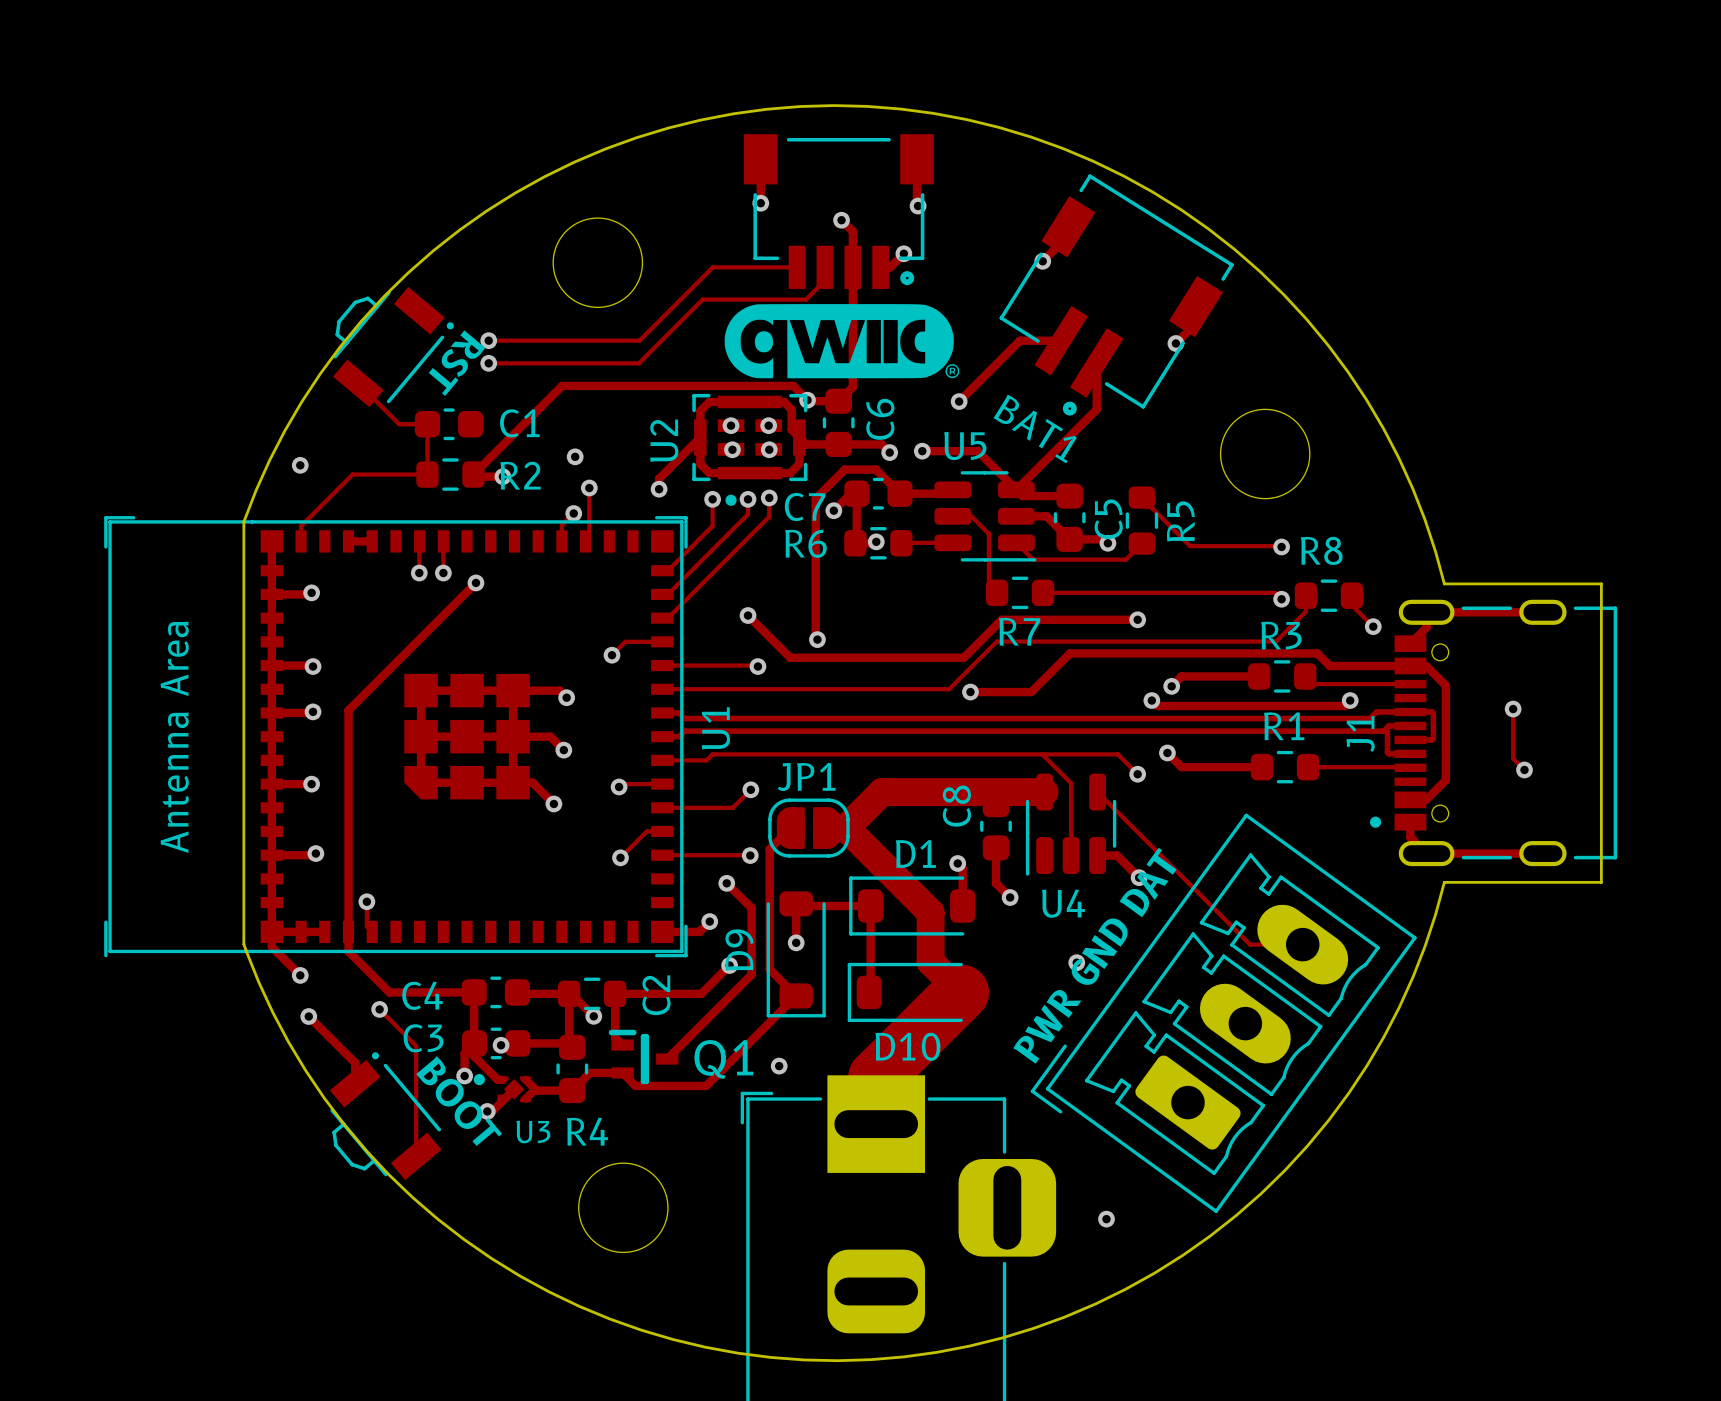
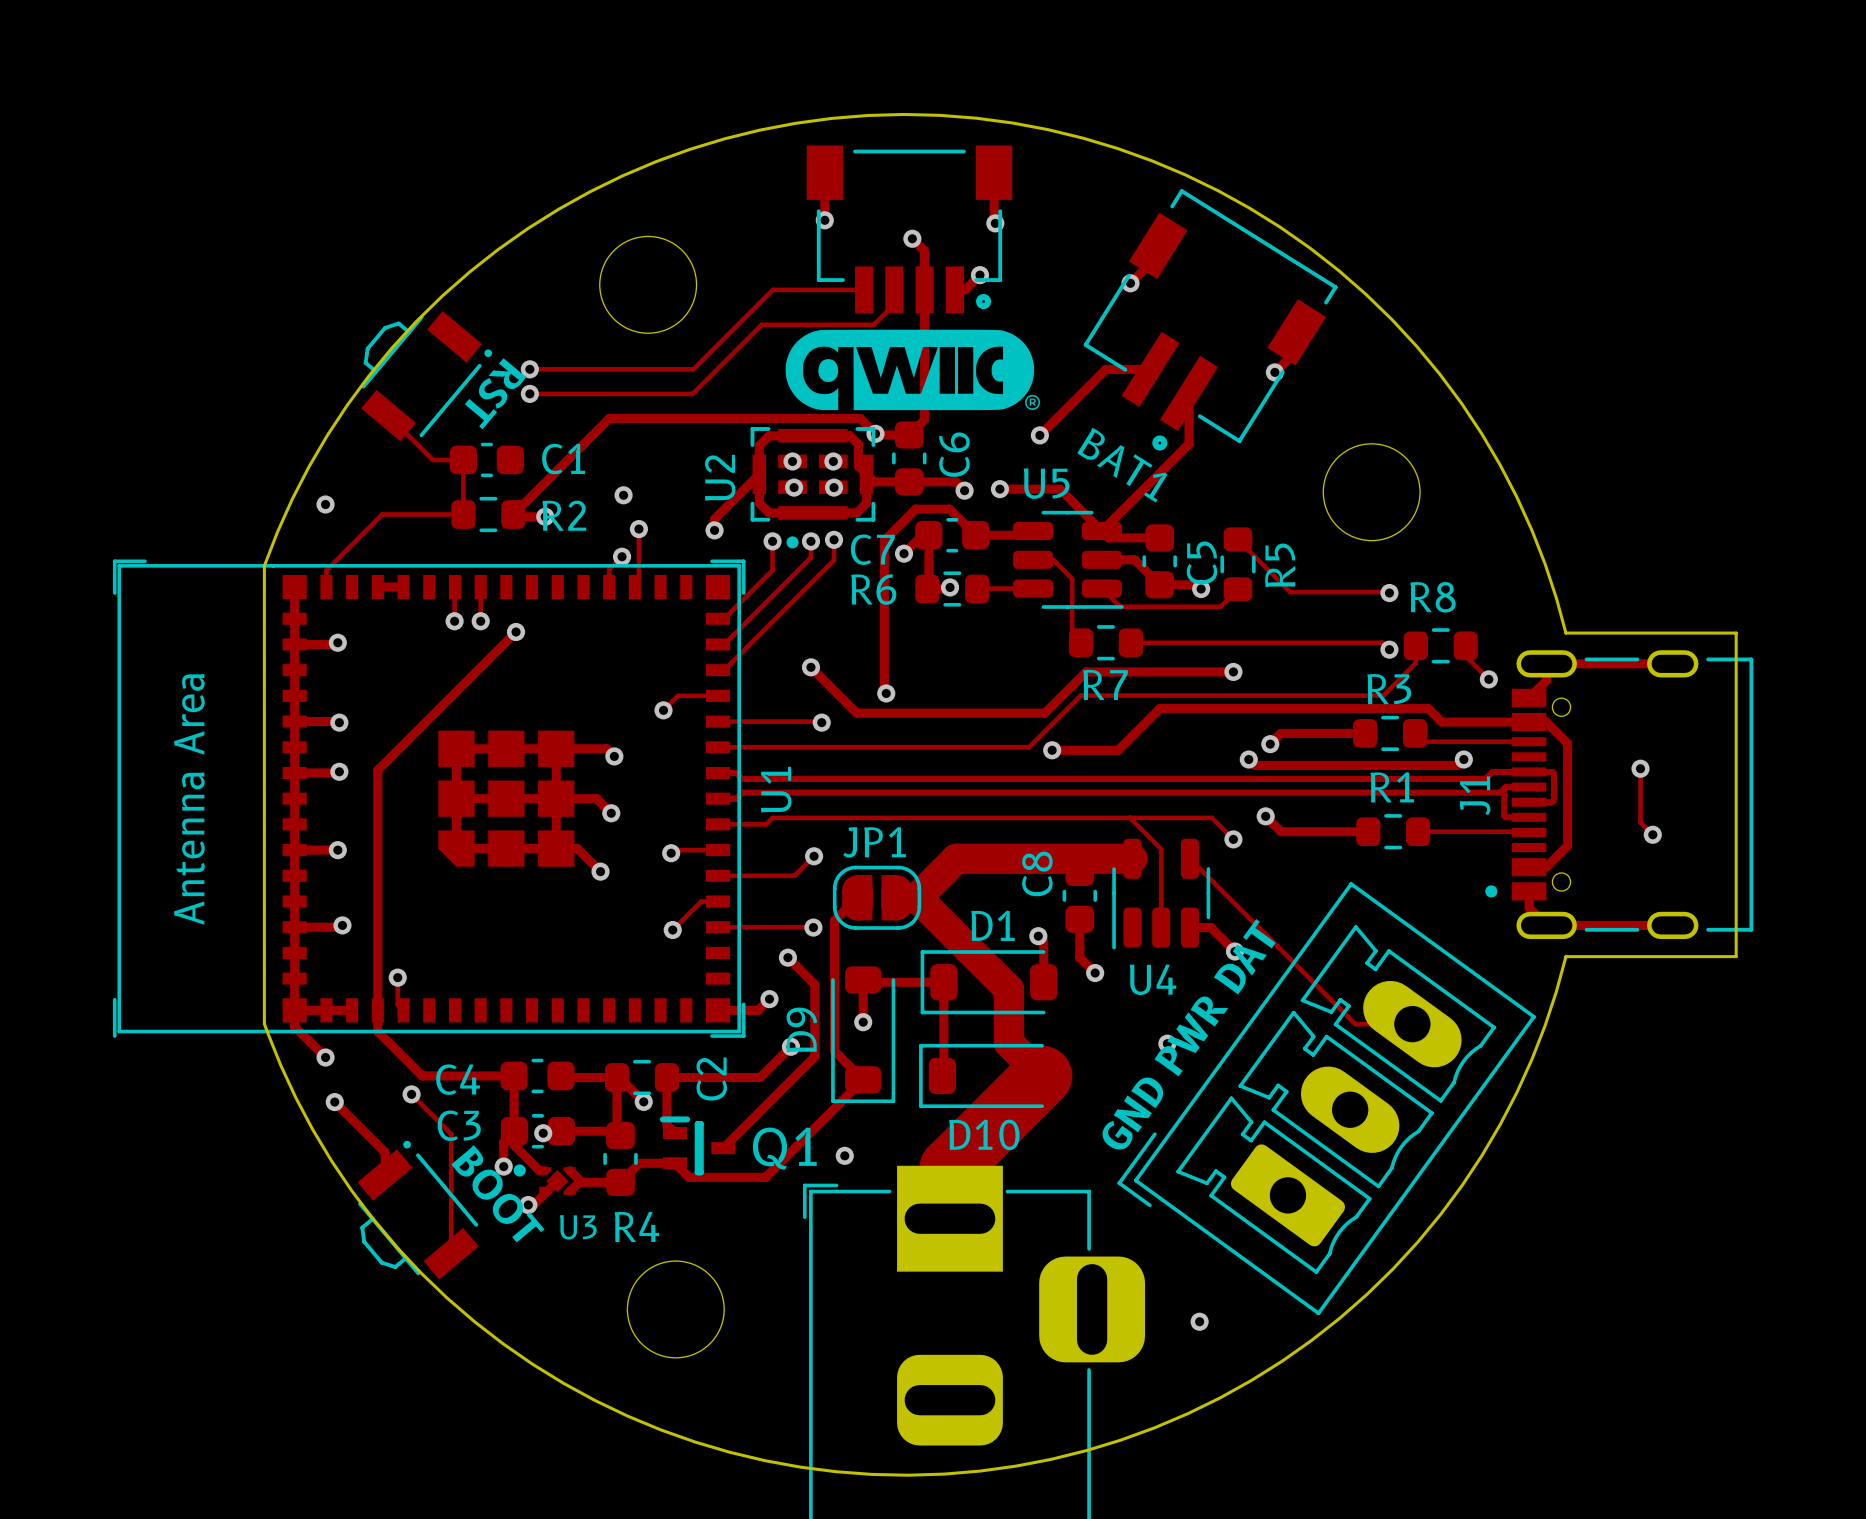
text: PWR GND DAT (1095, 955) -> GND PWR DAT (1188, 1034)

